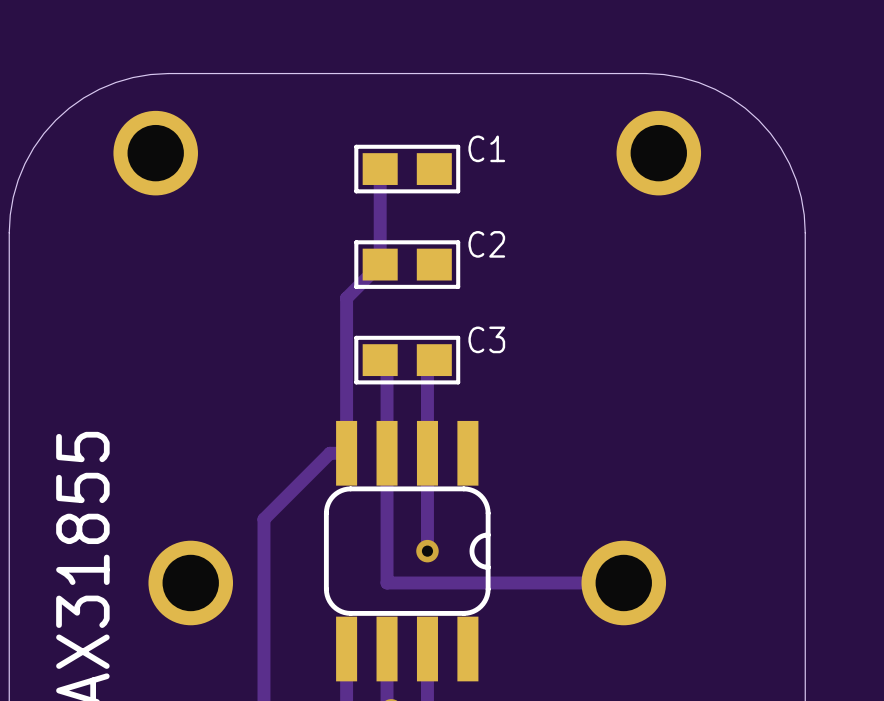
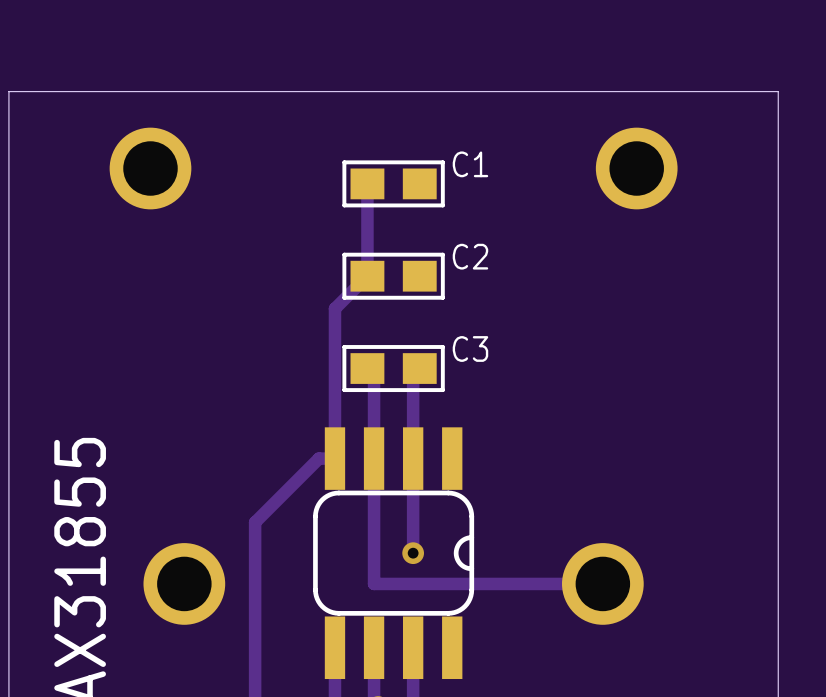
board edge: (168, 73) (150, 74) (115, 82) (83, 97) (55, 120) (33, 148) (18, 180) (10, 214) (9, 232) -> (162, 91) (8, 91) (8, 245)
board edge: (646, 73) (663, 74) (698, 82) (730, 97) (758, 120) (780, 148) (796, 180) (804, 214) (805, 232) -> (624, 91) (778, 91) (778, 245)

